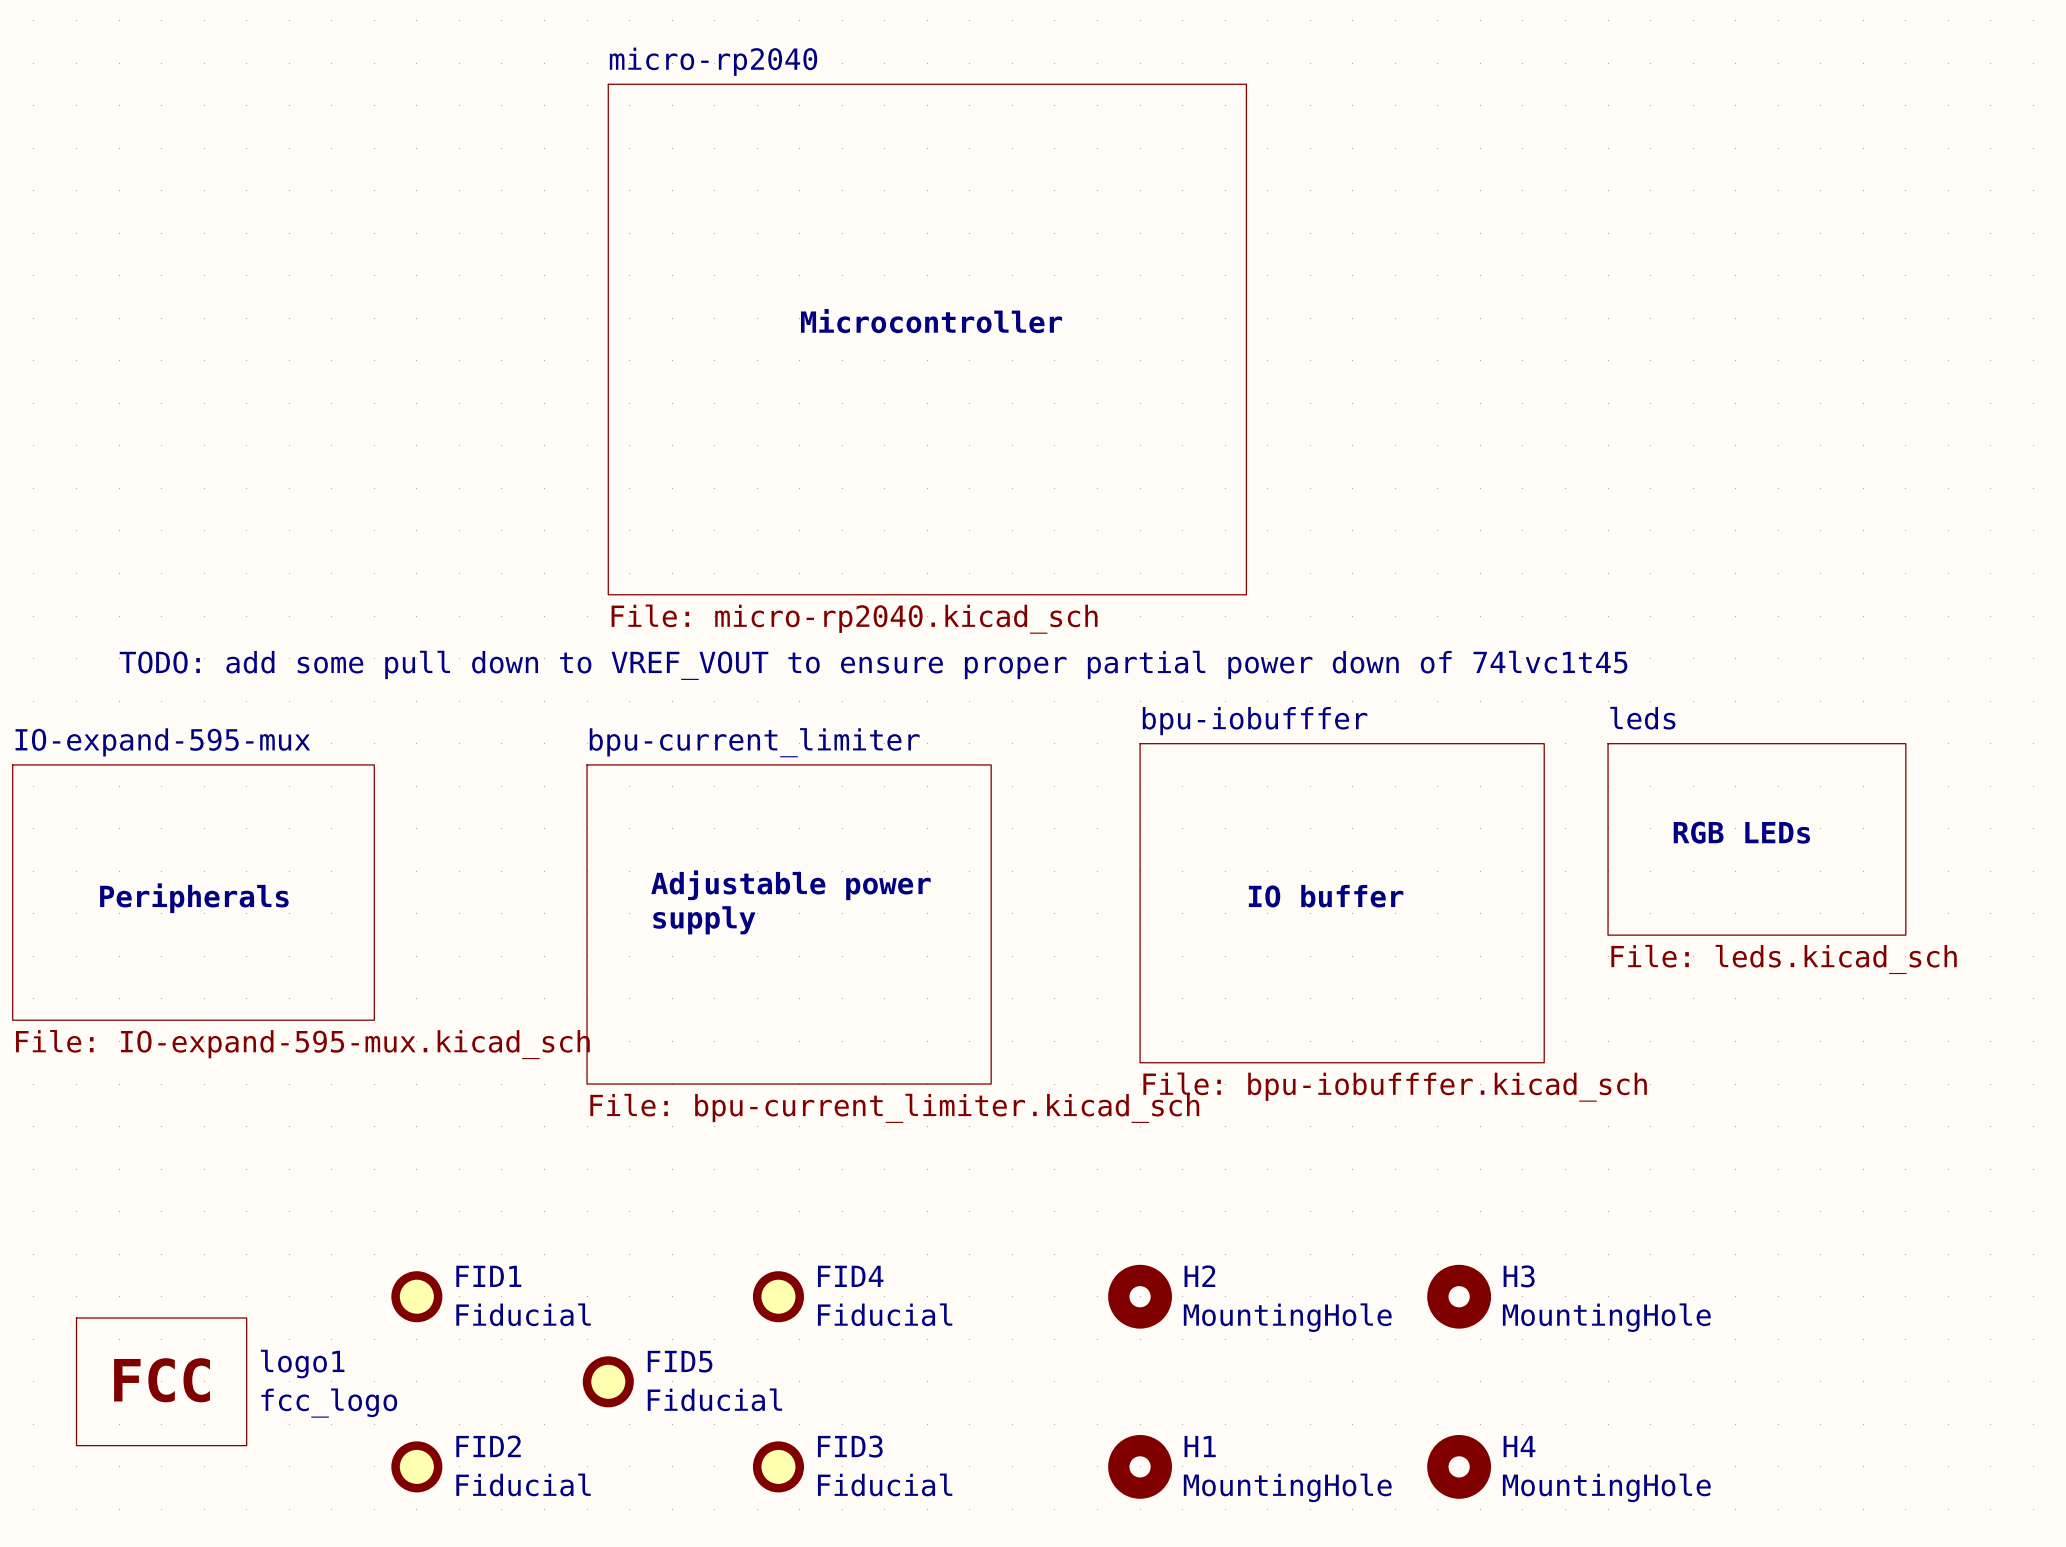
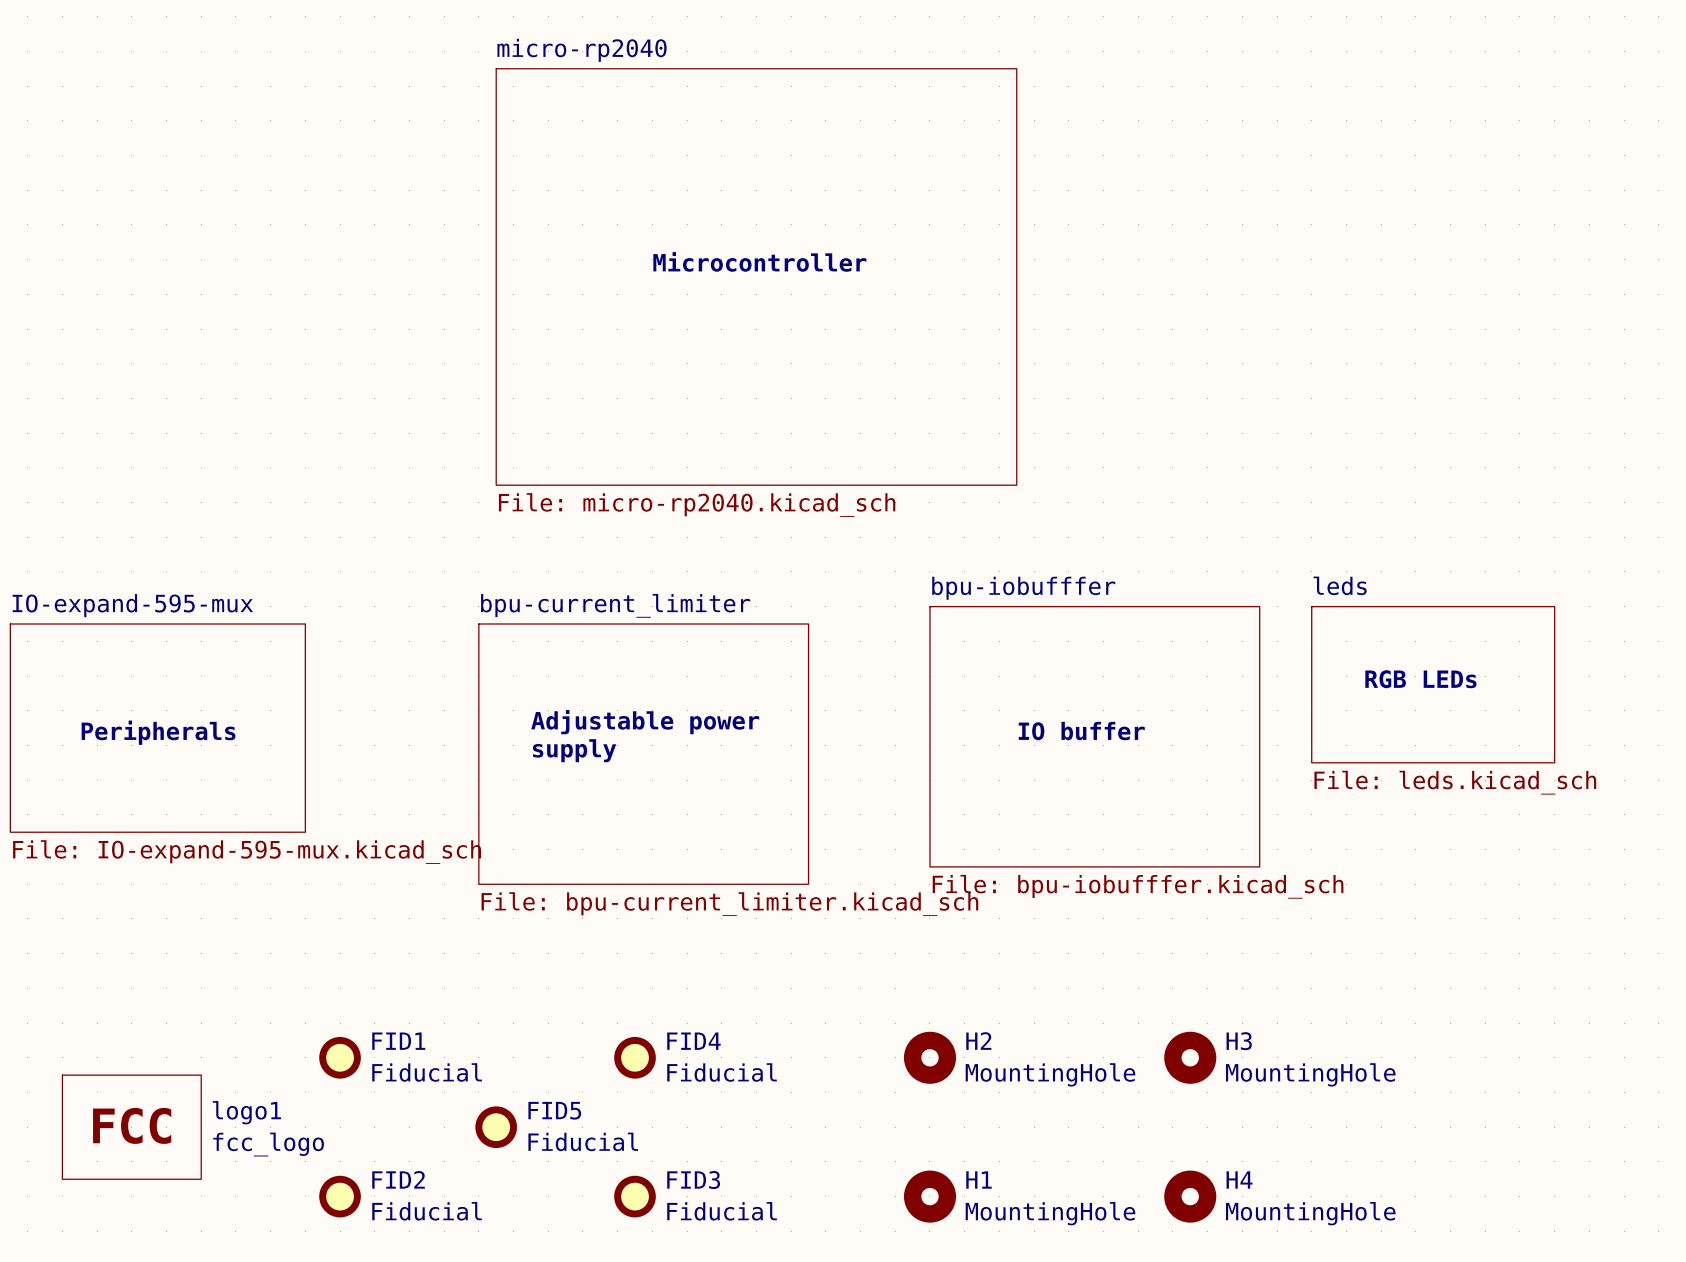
text: TODO: add some pull down to VREF_VOUT to ensure proper partial power down of 74lvc1t45 (873, 665) -> none

